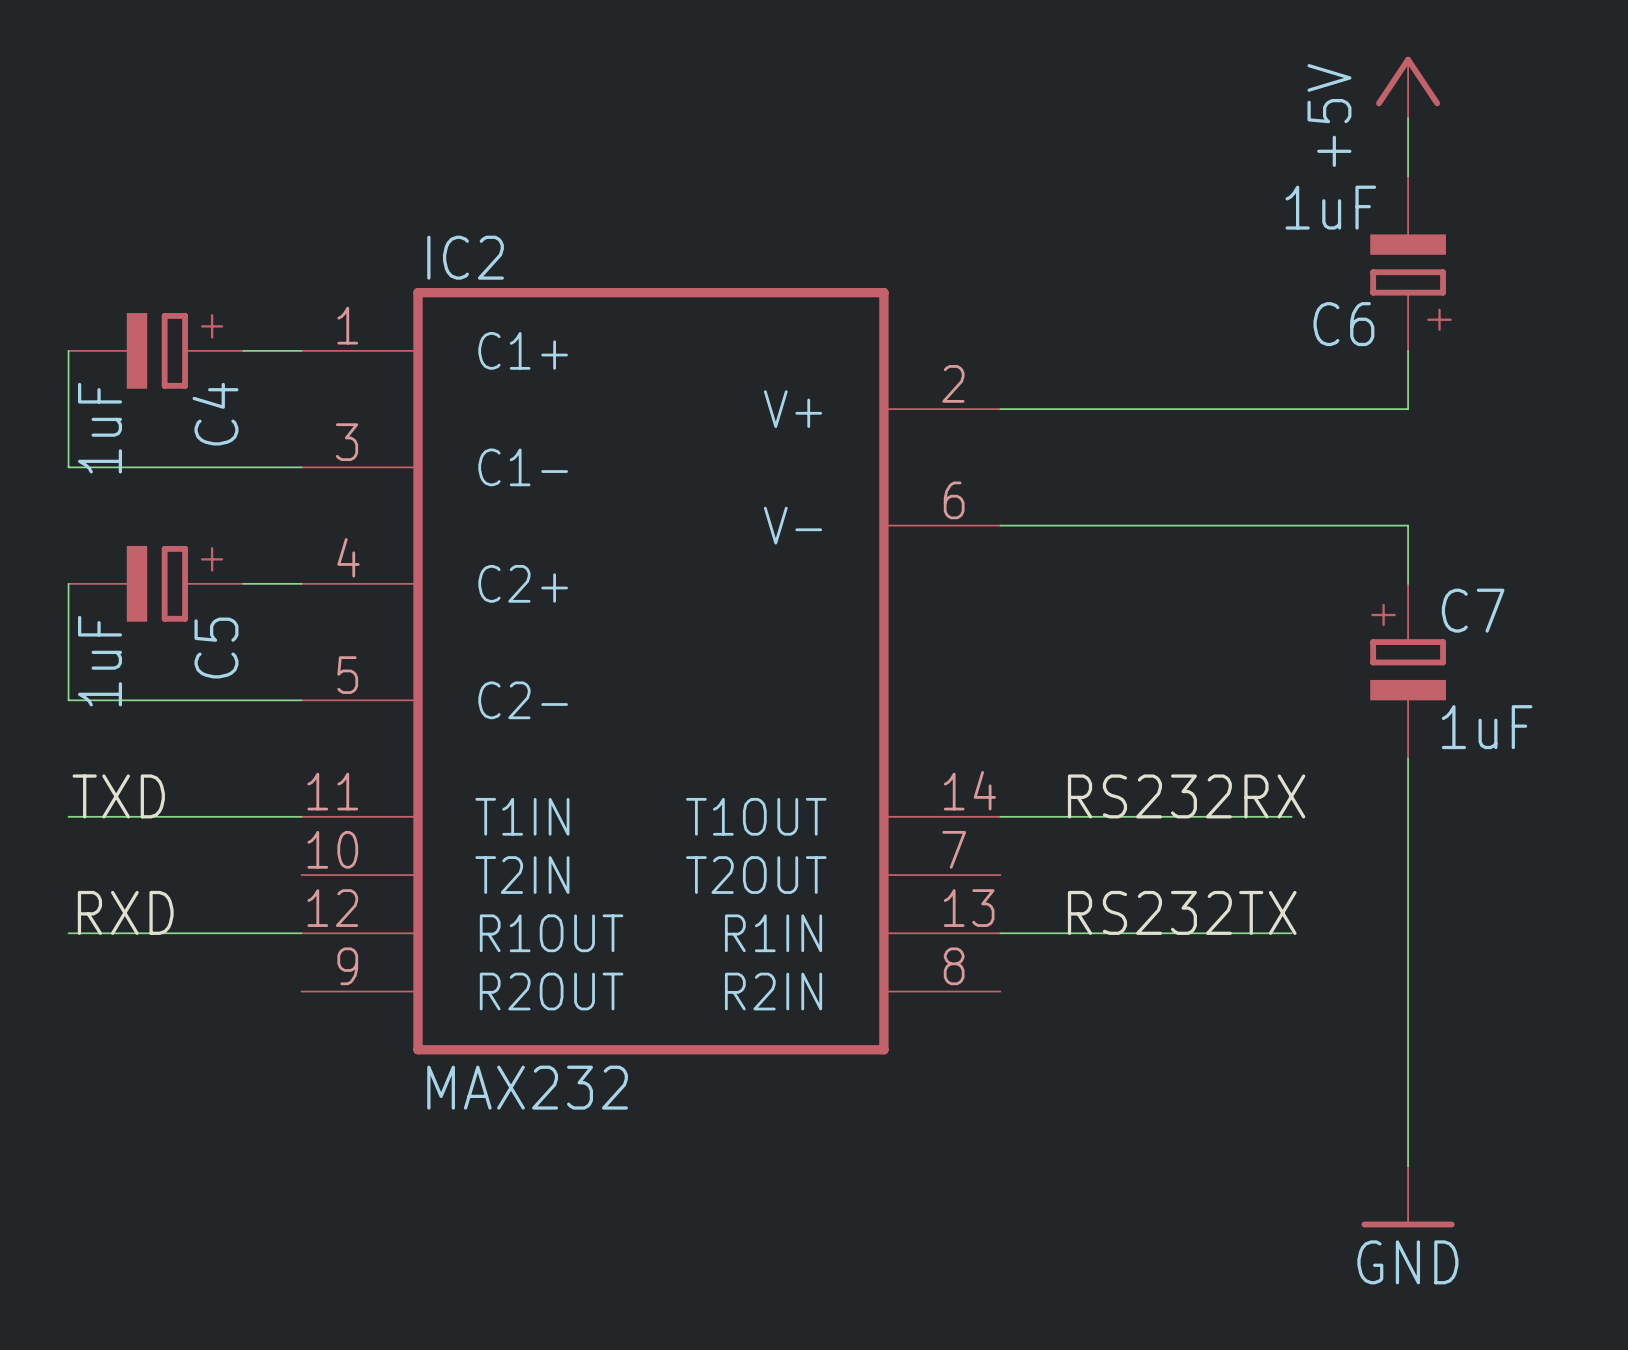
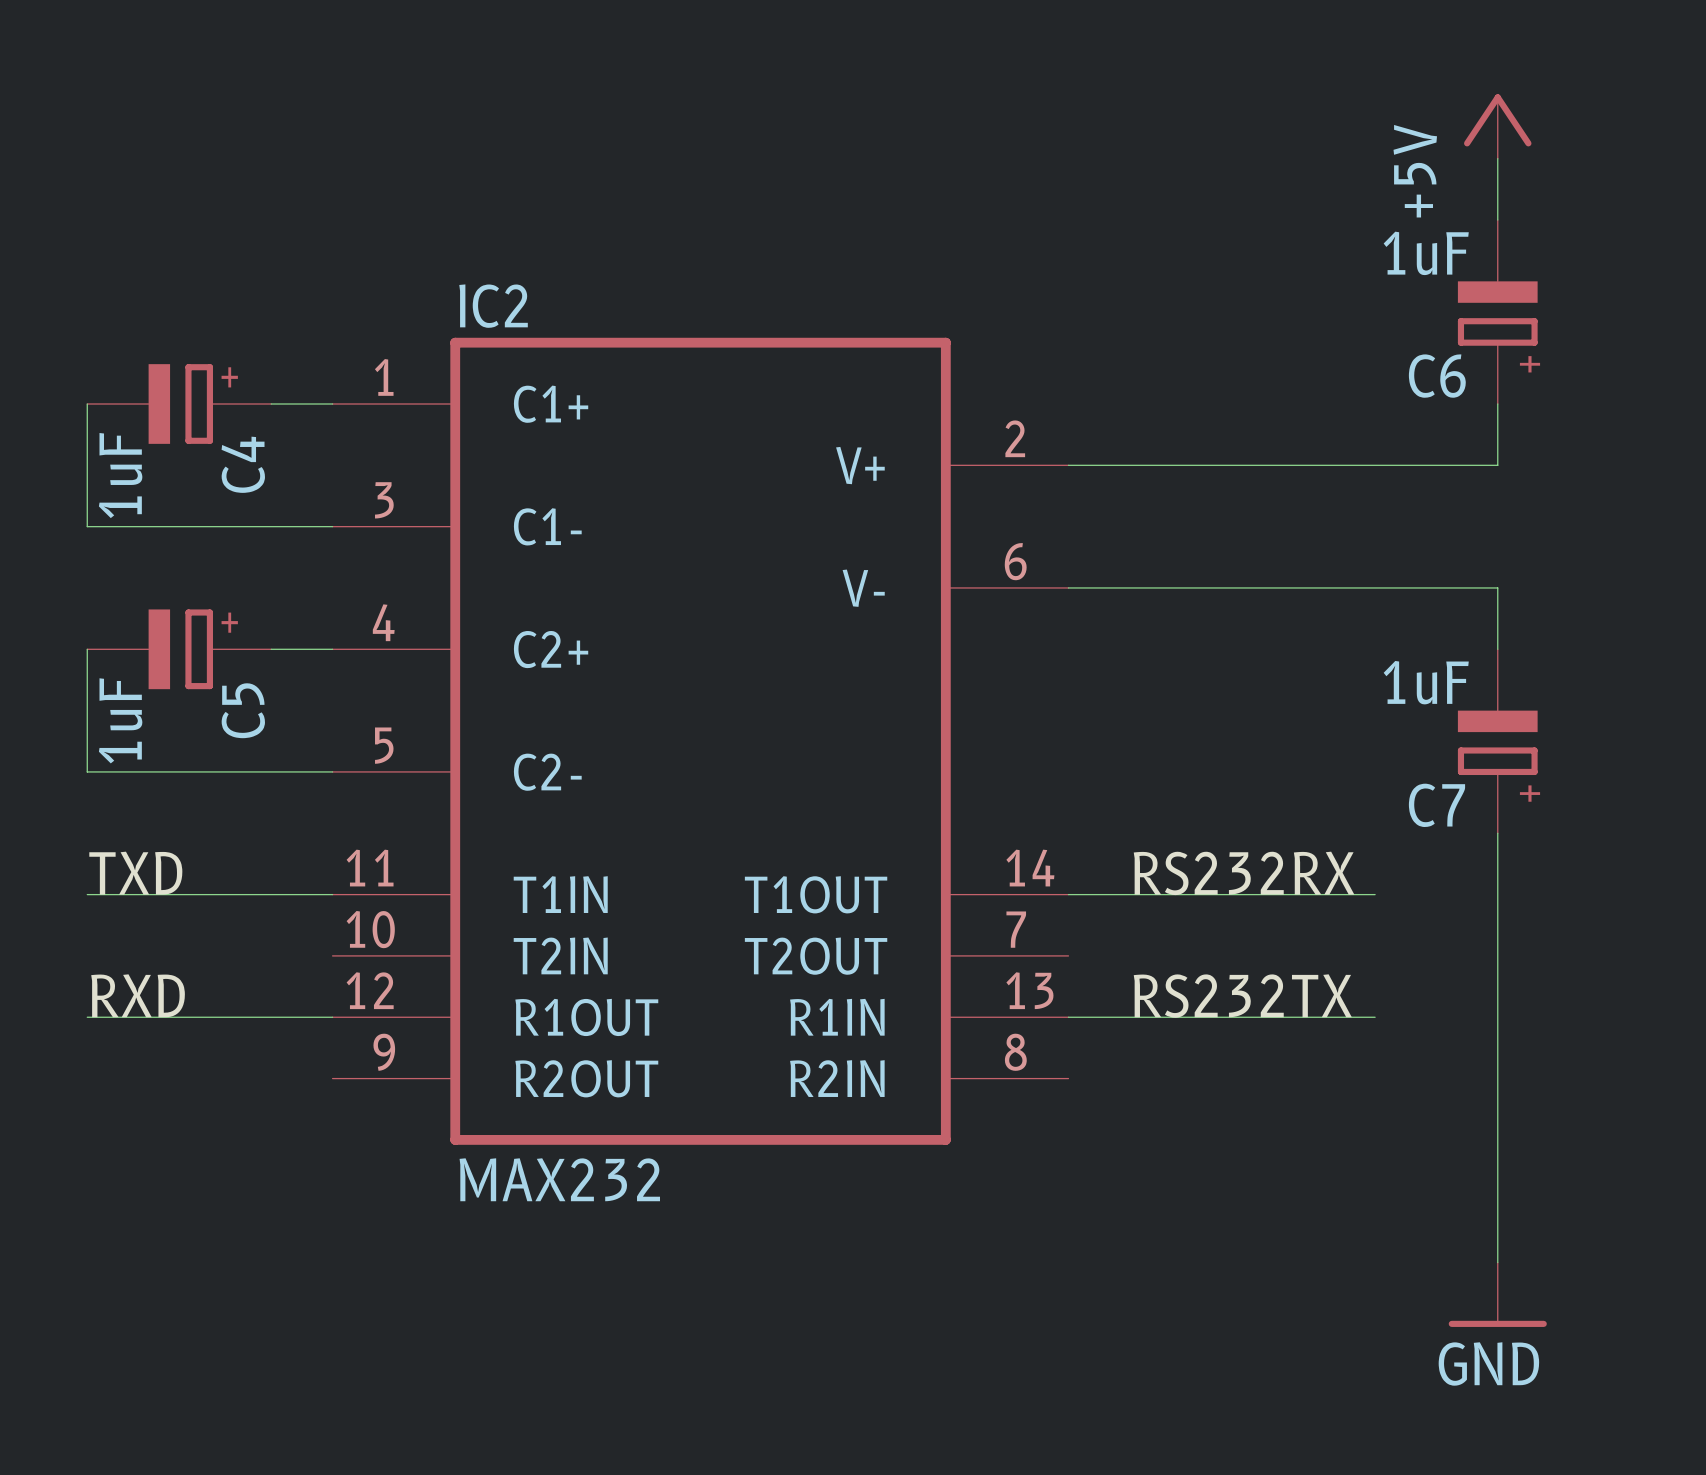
C7 symbol: [1370, 583, 1446, 759] -> [1457, 649, 1538, 834]
C7 name position: C7 (1473, 610) -> C7 (1436, 805)
C7 value position: 1uF (1487, 727) -> 1uF (1426, 682)

